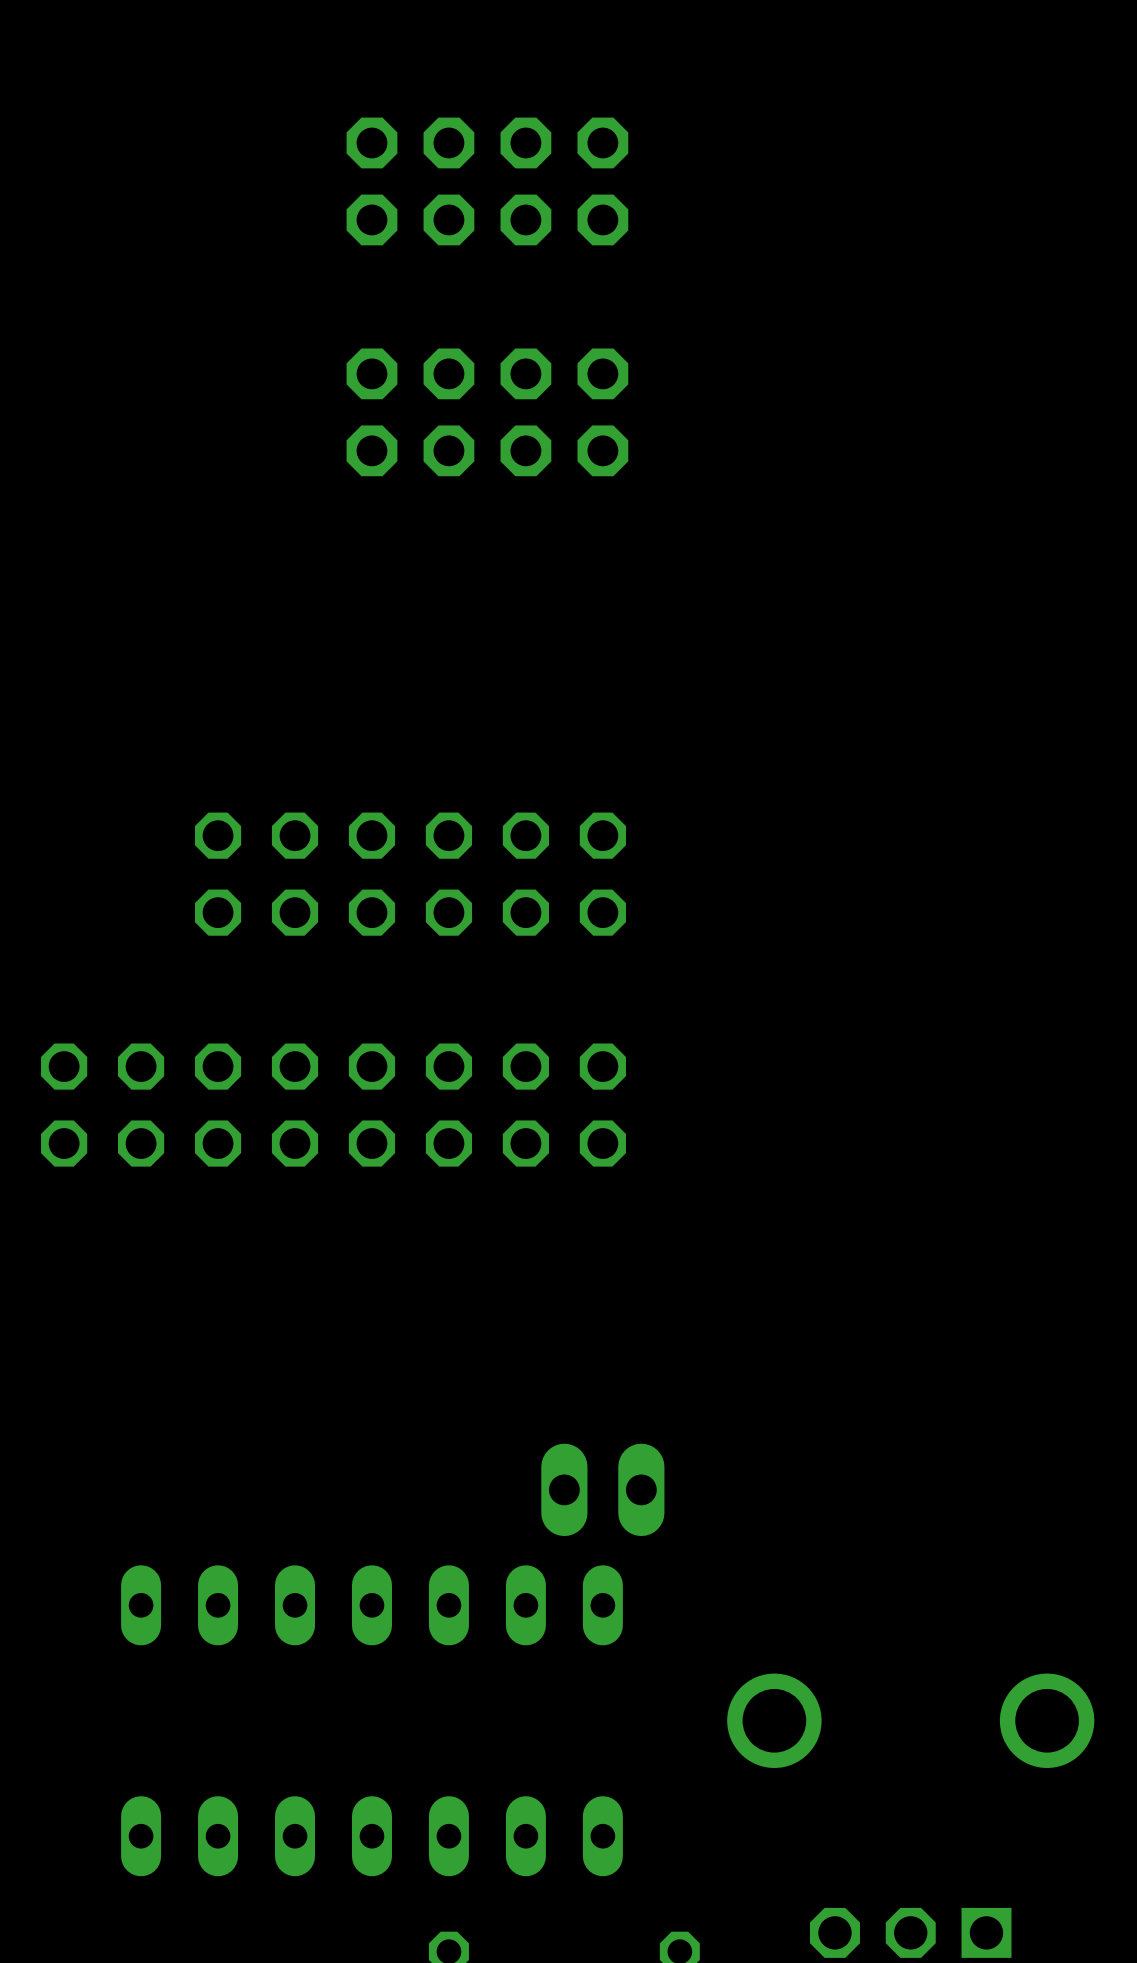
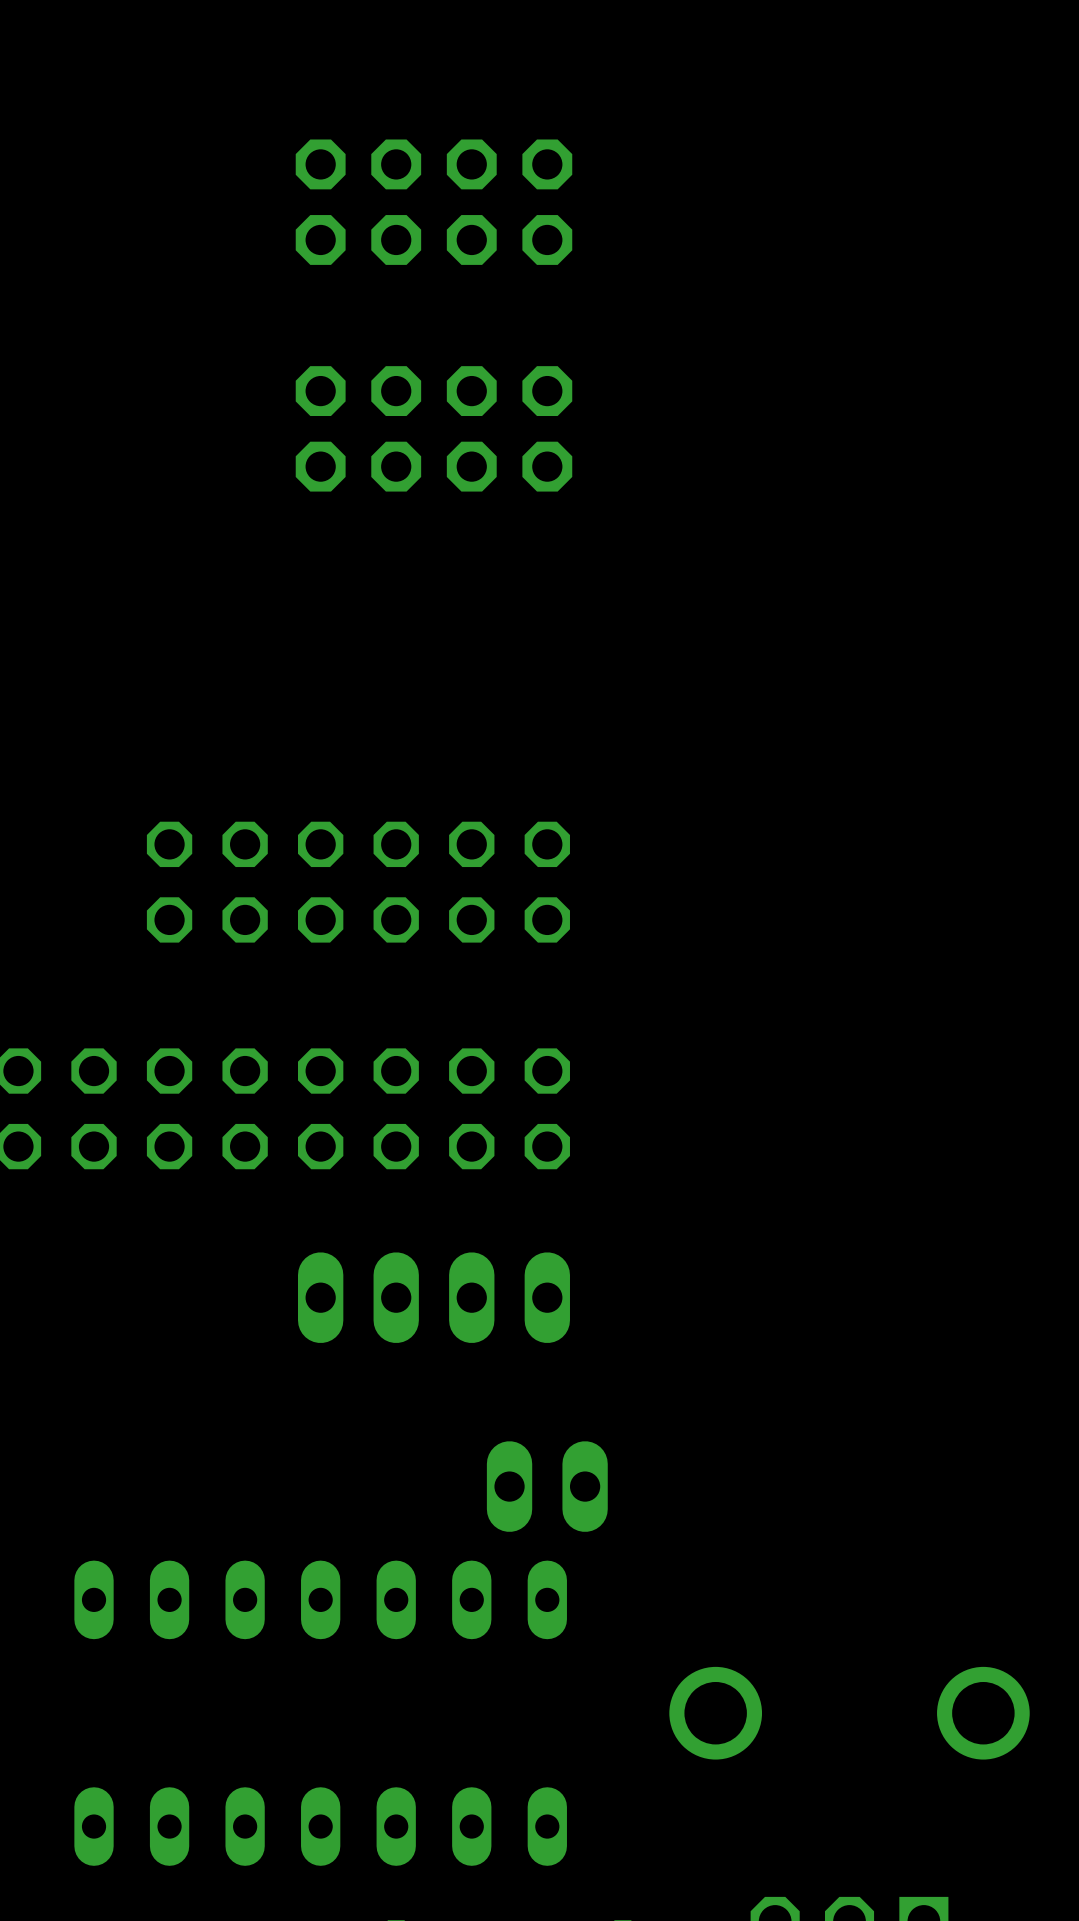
part: none -> (433, 1297)

